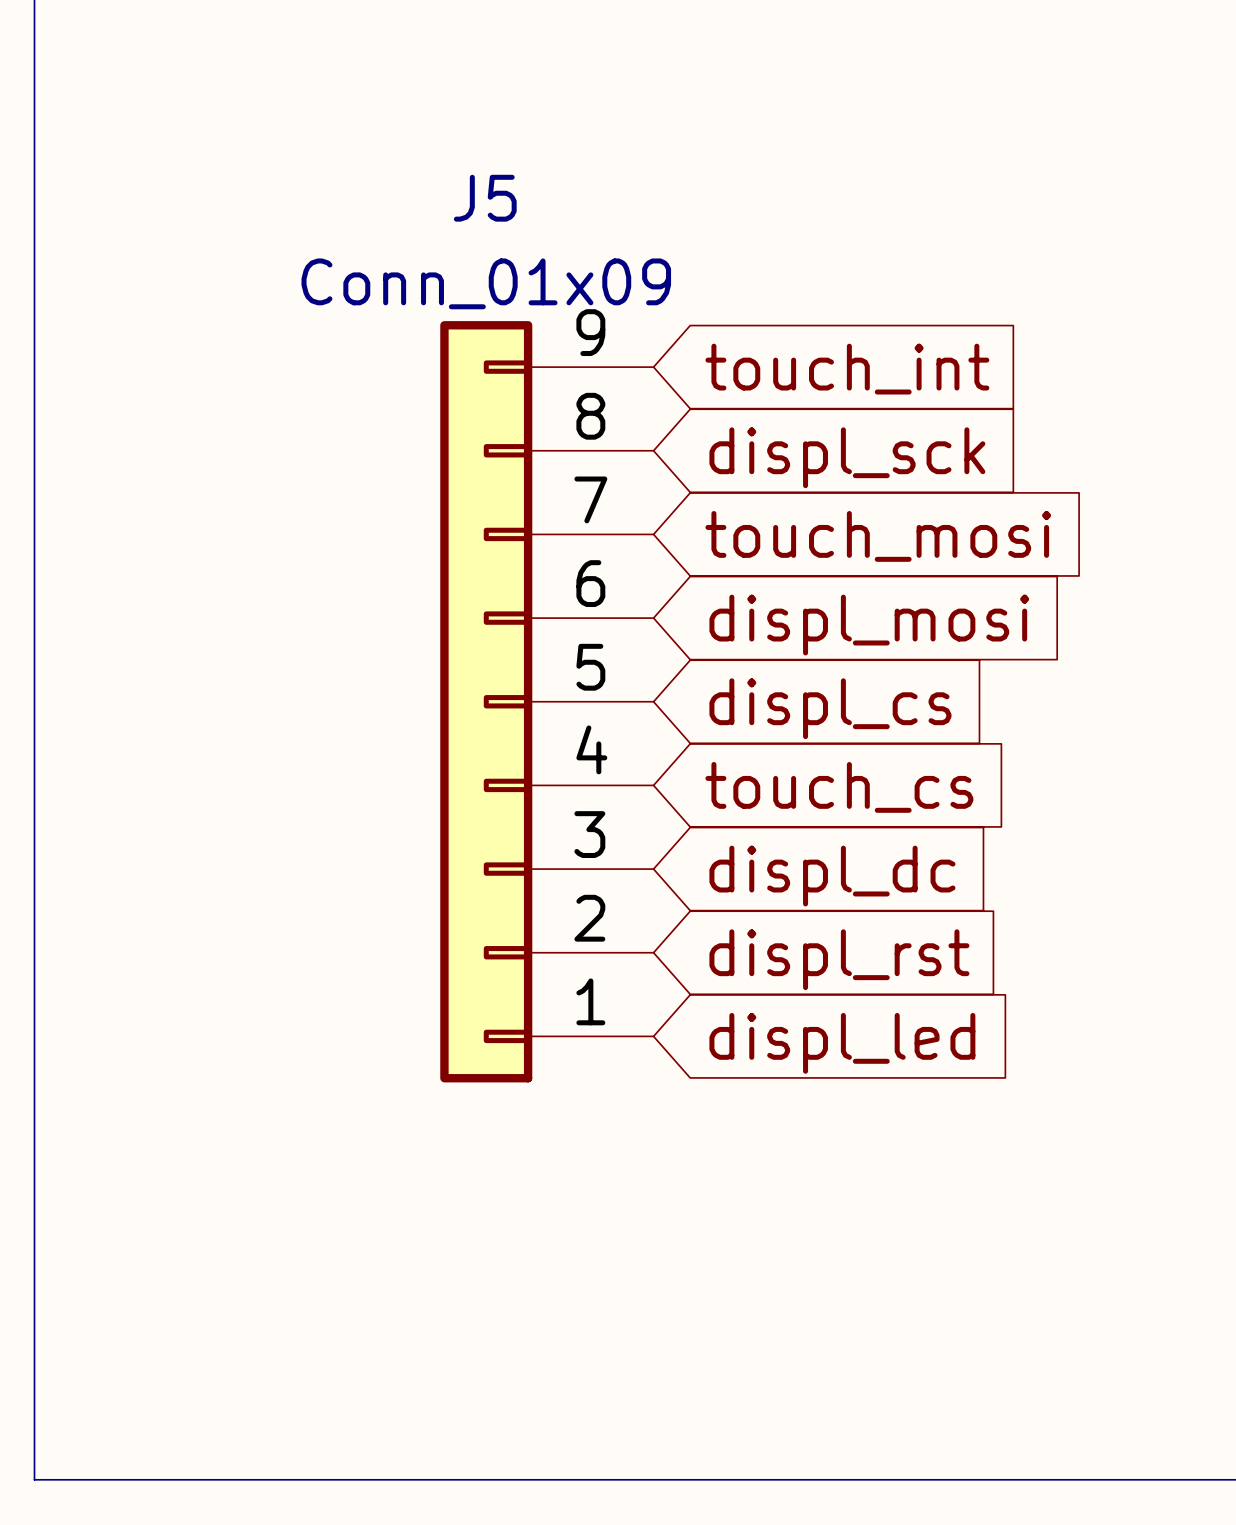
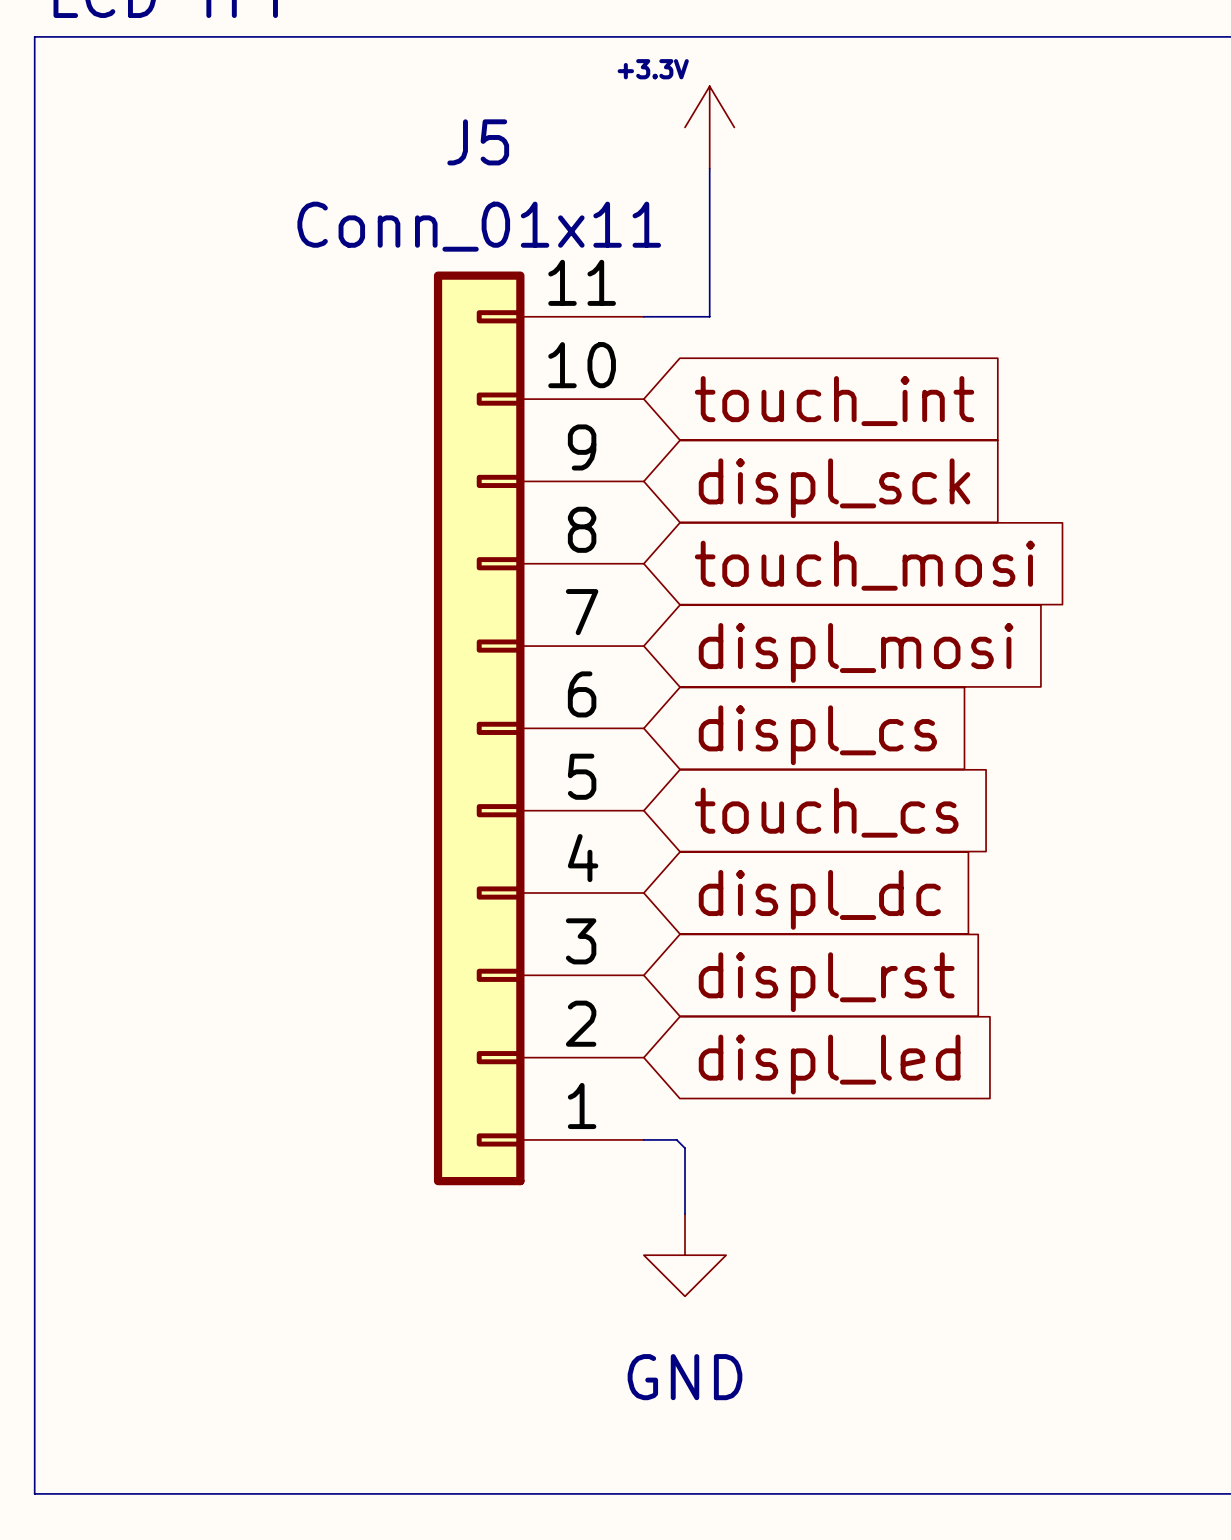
power symbol: none -> +3.3V (709, 127)
wire: none -> (709, 168) (709, 316) (643, 316)
J5 name position: J5 (485, 198) -> J5 (478, 142)
J5 value: Conn_01x09 (486, 283) -> Conn_01x11 (479, 226)
J5 symbol: [440, 321, 654, 1083] -> [433, 271, 644, 1186]
wire: none -> (643, 1139) (676, 1139) (685, 1148) (685, 1214)
power symbol: none -> GND (685, 1255)

